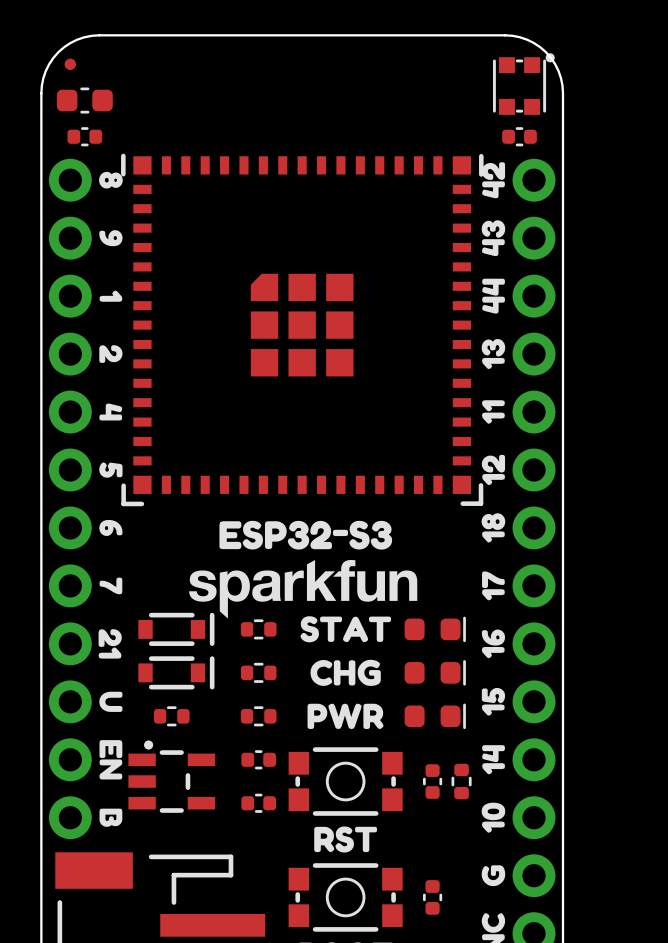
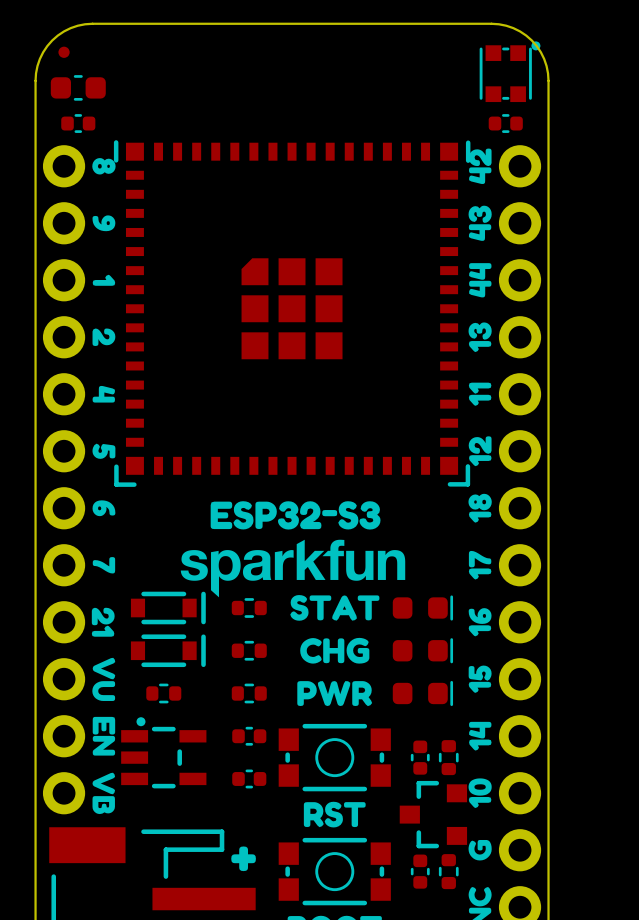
drawing shape: [99, 691, 123, 712] -> [92, 657, 116, 701]
drawing shape: [99, 808, 123, 827] -> [92, 772, 116, 815]
part: none -> (433, 814)
drawing: none -> [231, 846, 256, 872]
part: none -> (448, 871)

